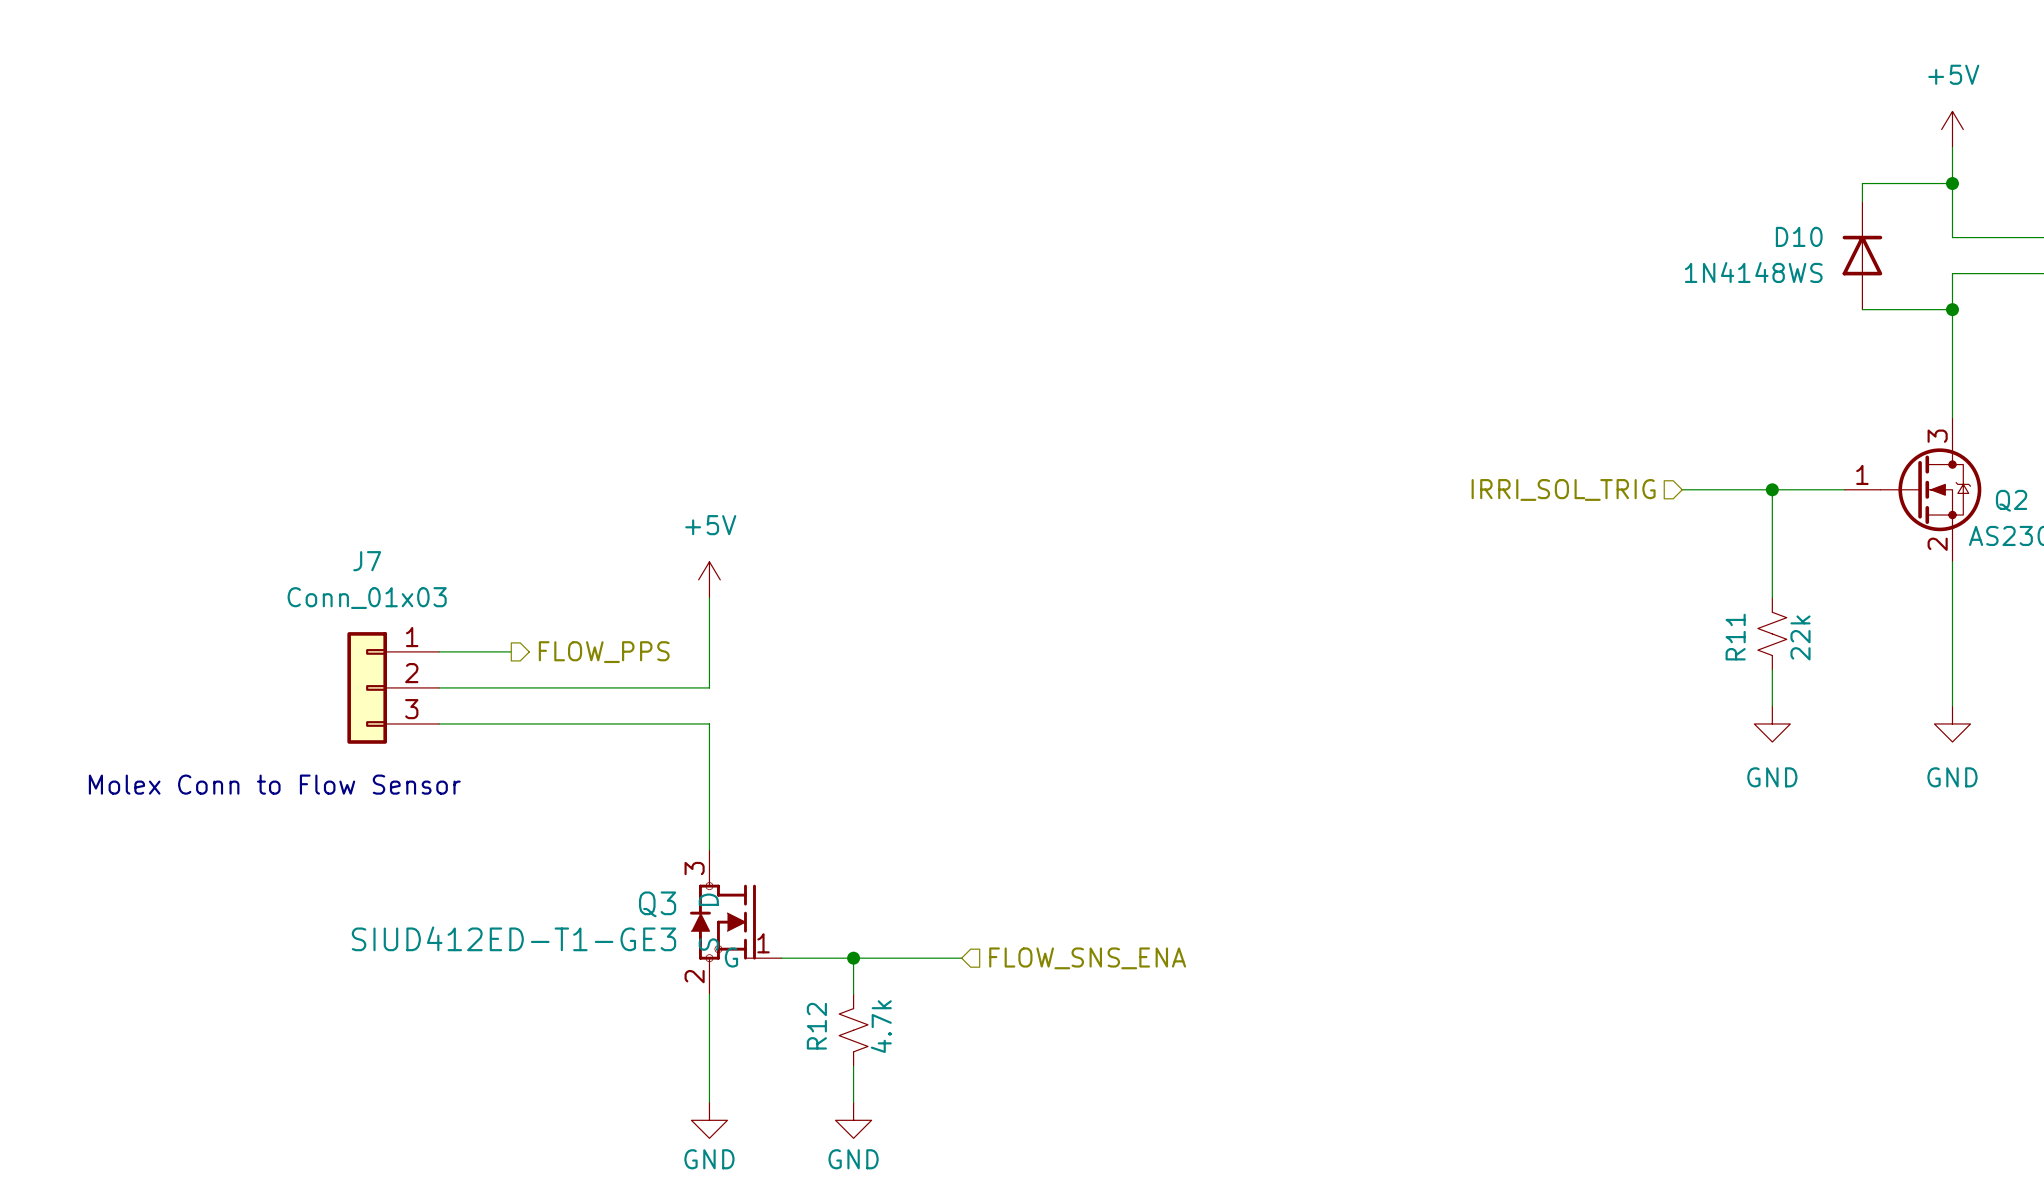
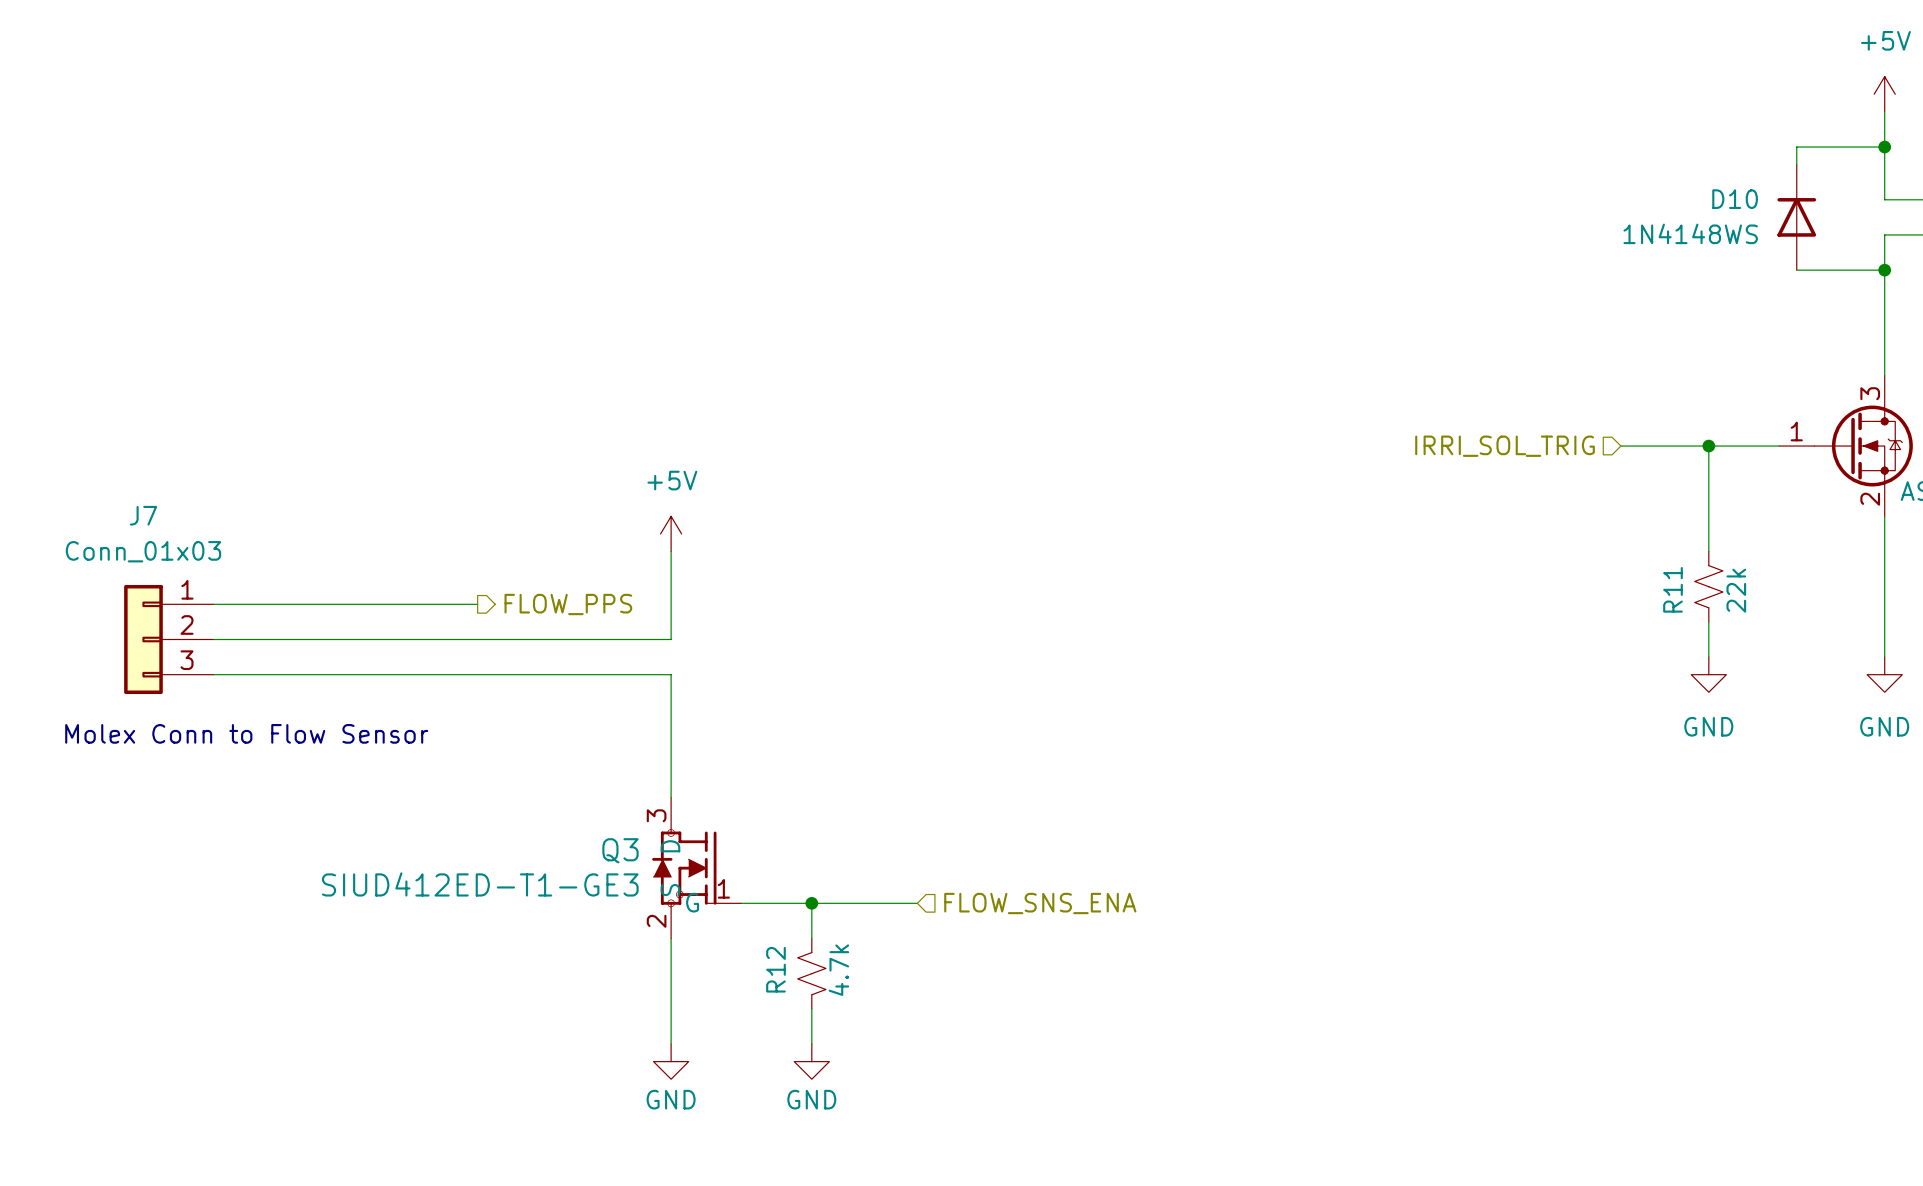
wire: none -> (213, 604) (407, 604)
wire: none -> (213, 639) (407, 639)
J7 position: (393, 687) -> (168, 639)
wire: none -> (213, 674) (407, 674)

